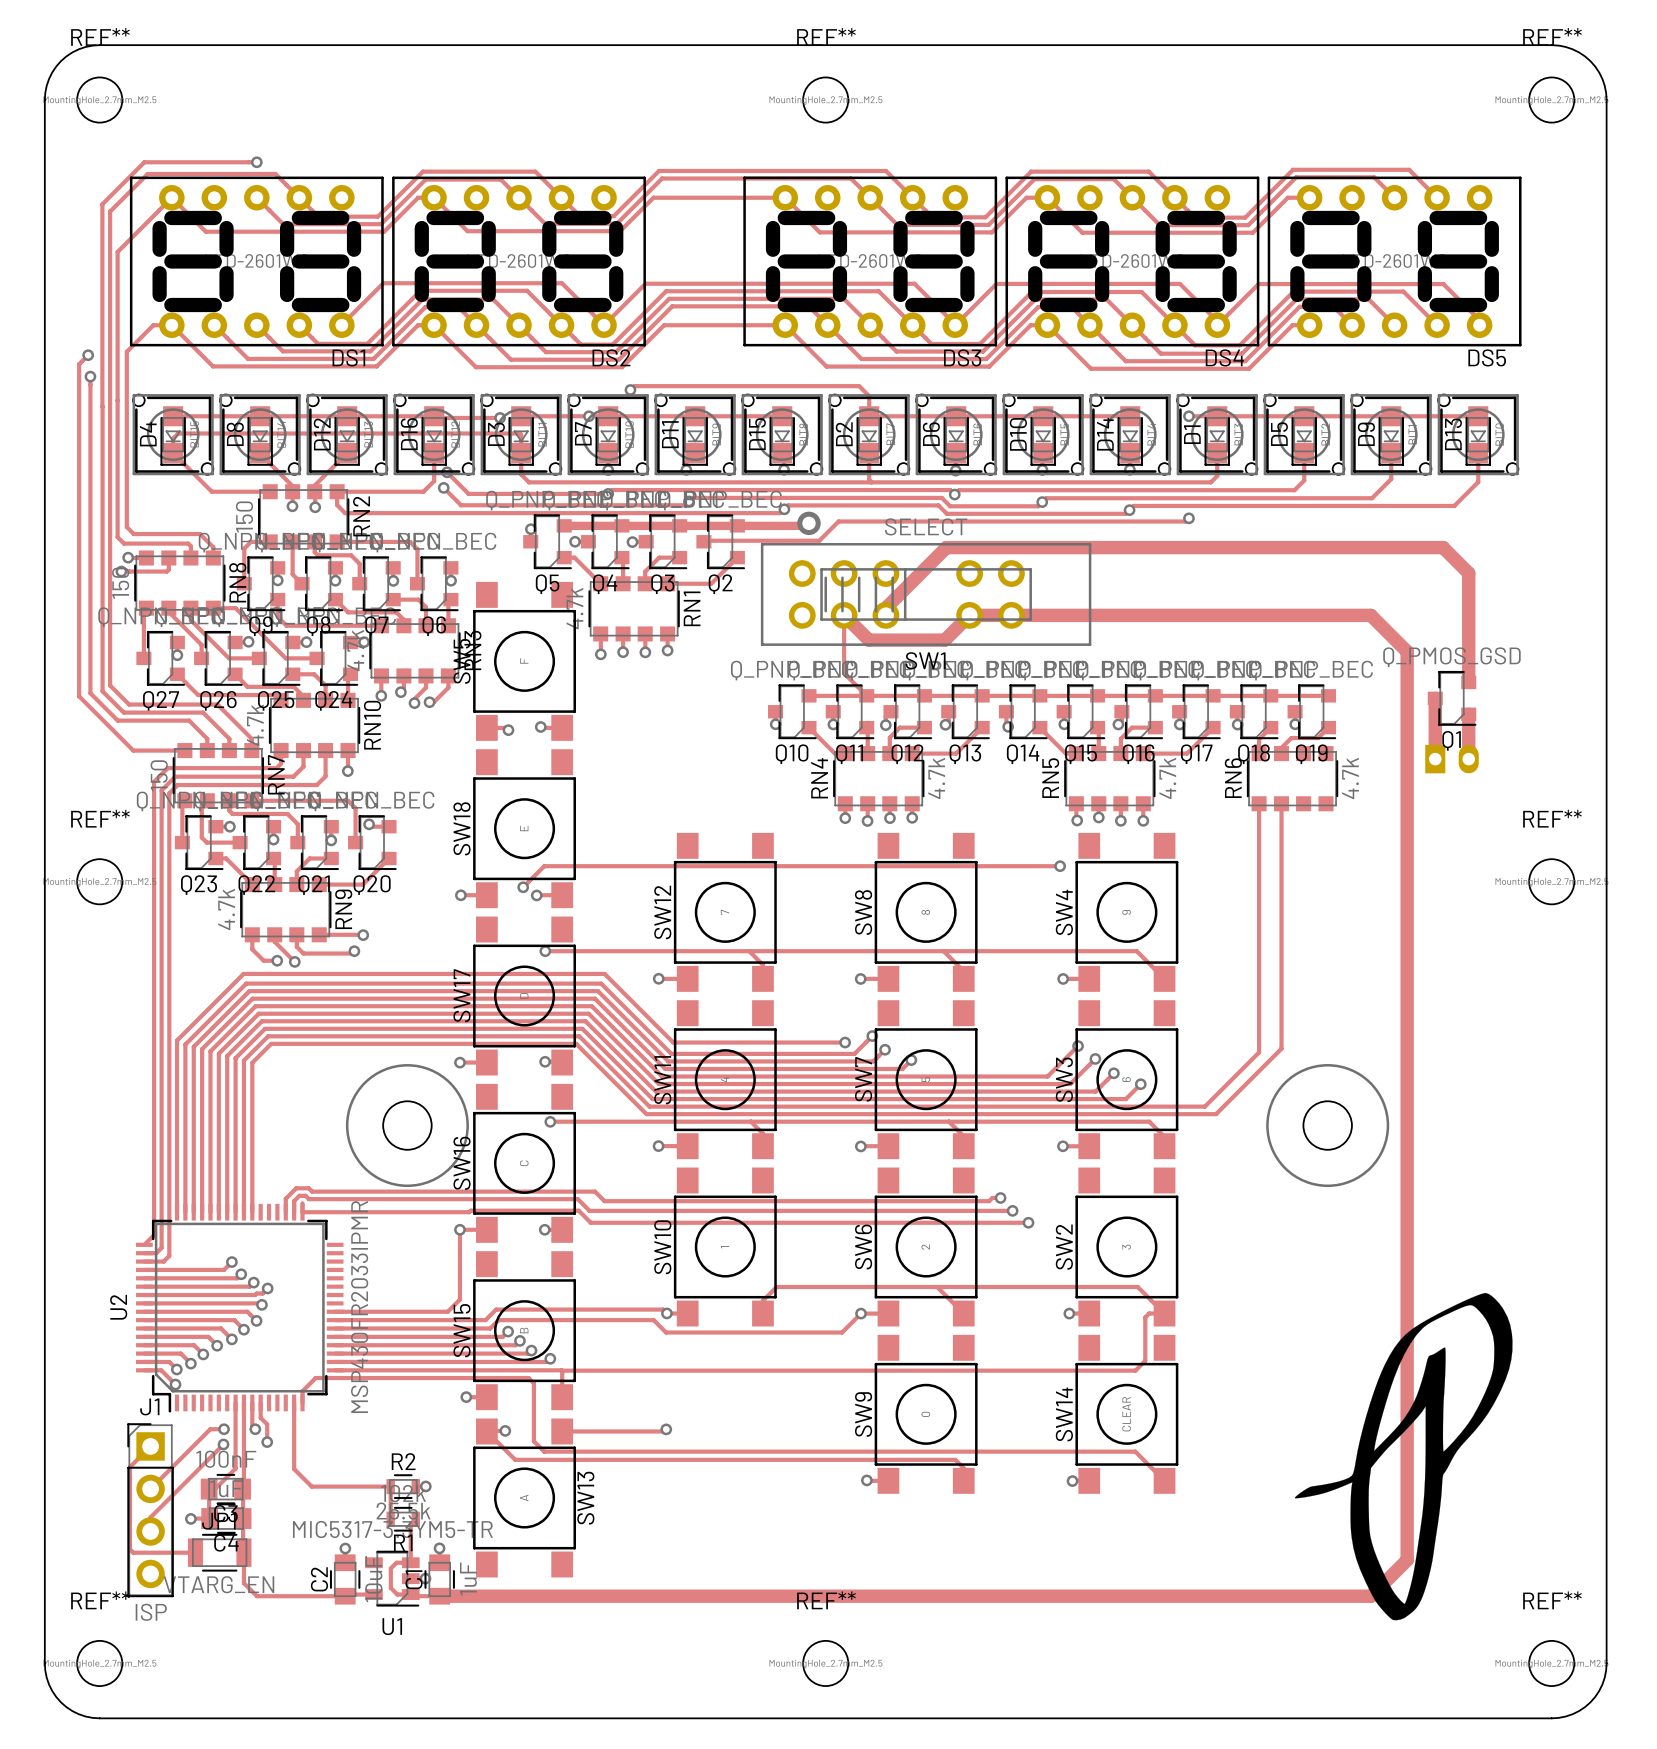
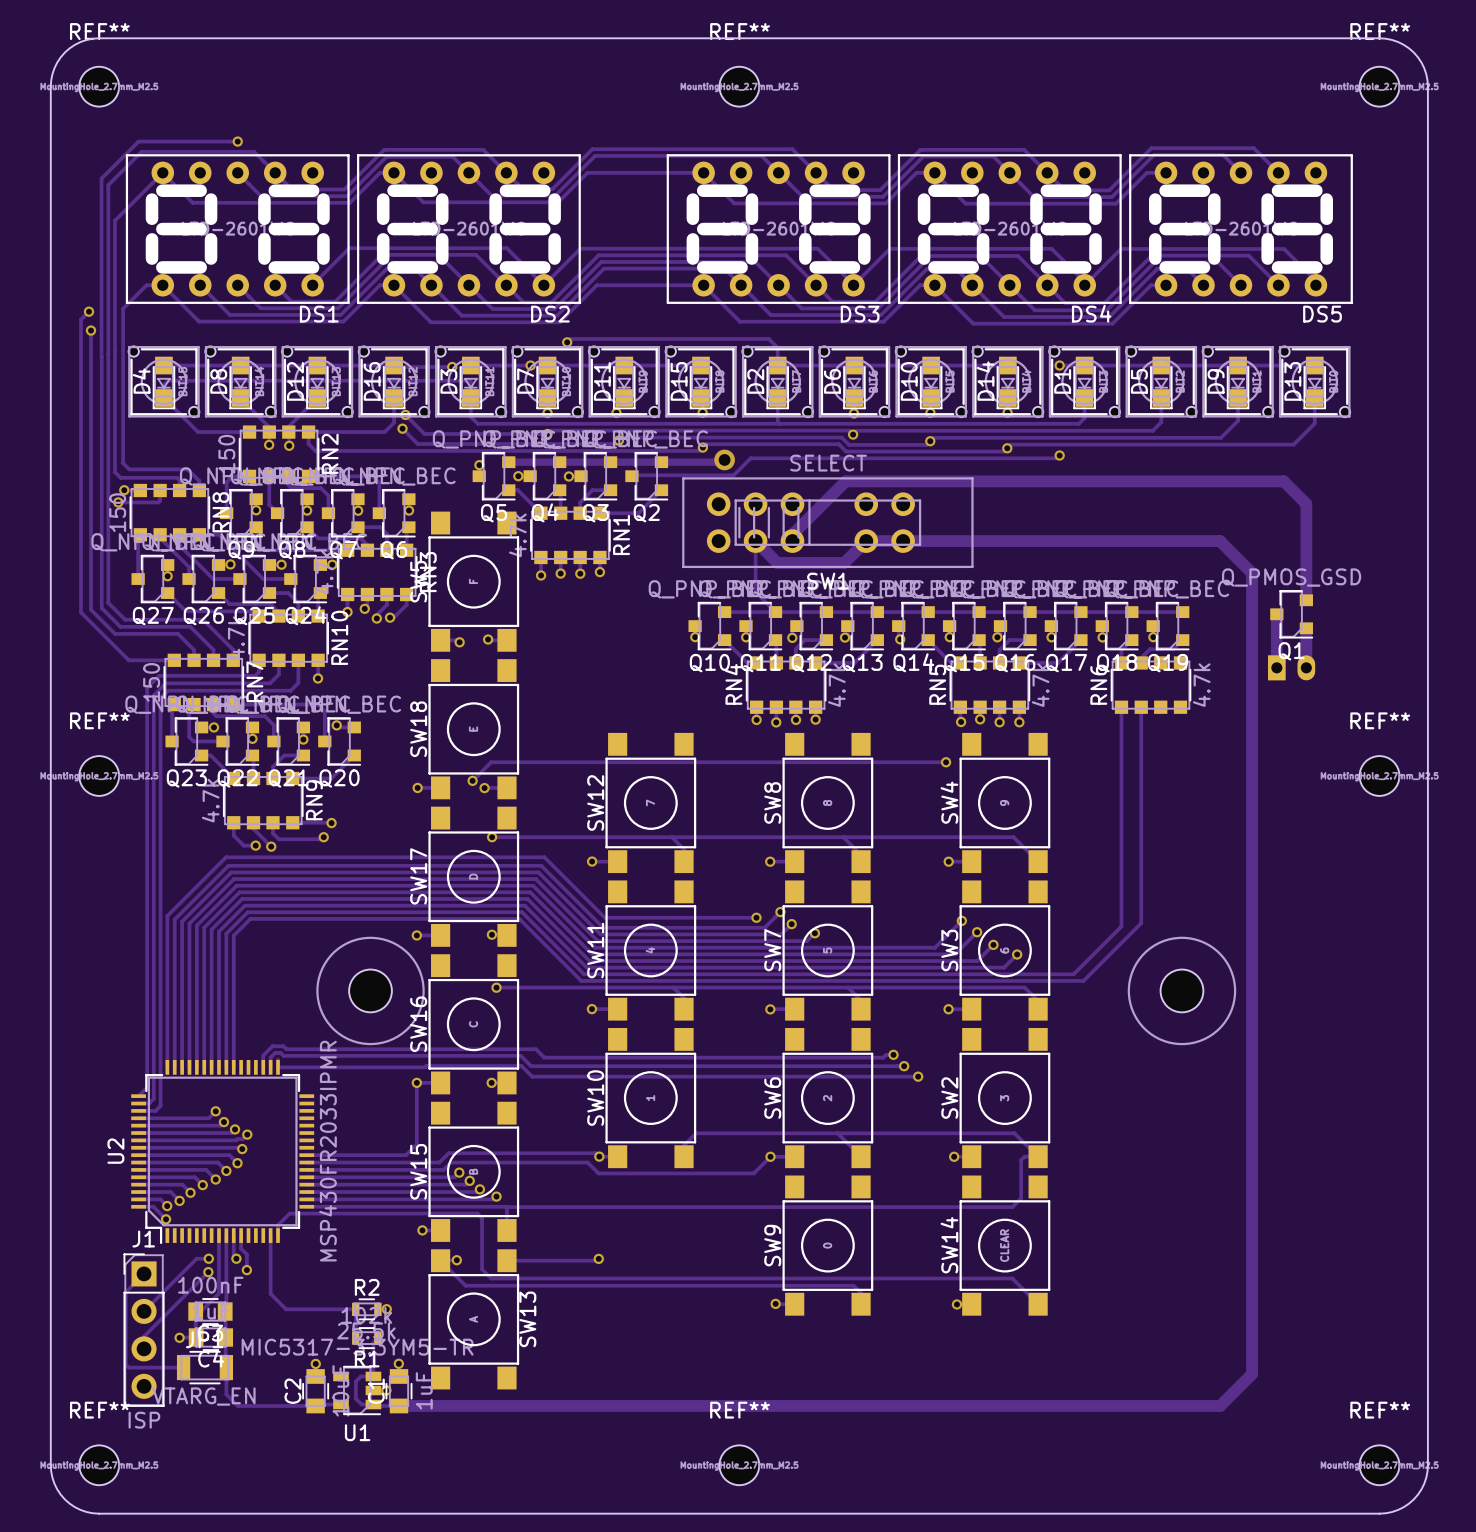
drawing: [1294, 1292, 1513, 1621] -> none

